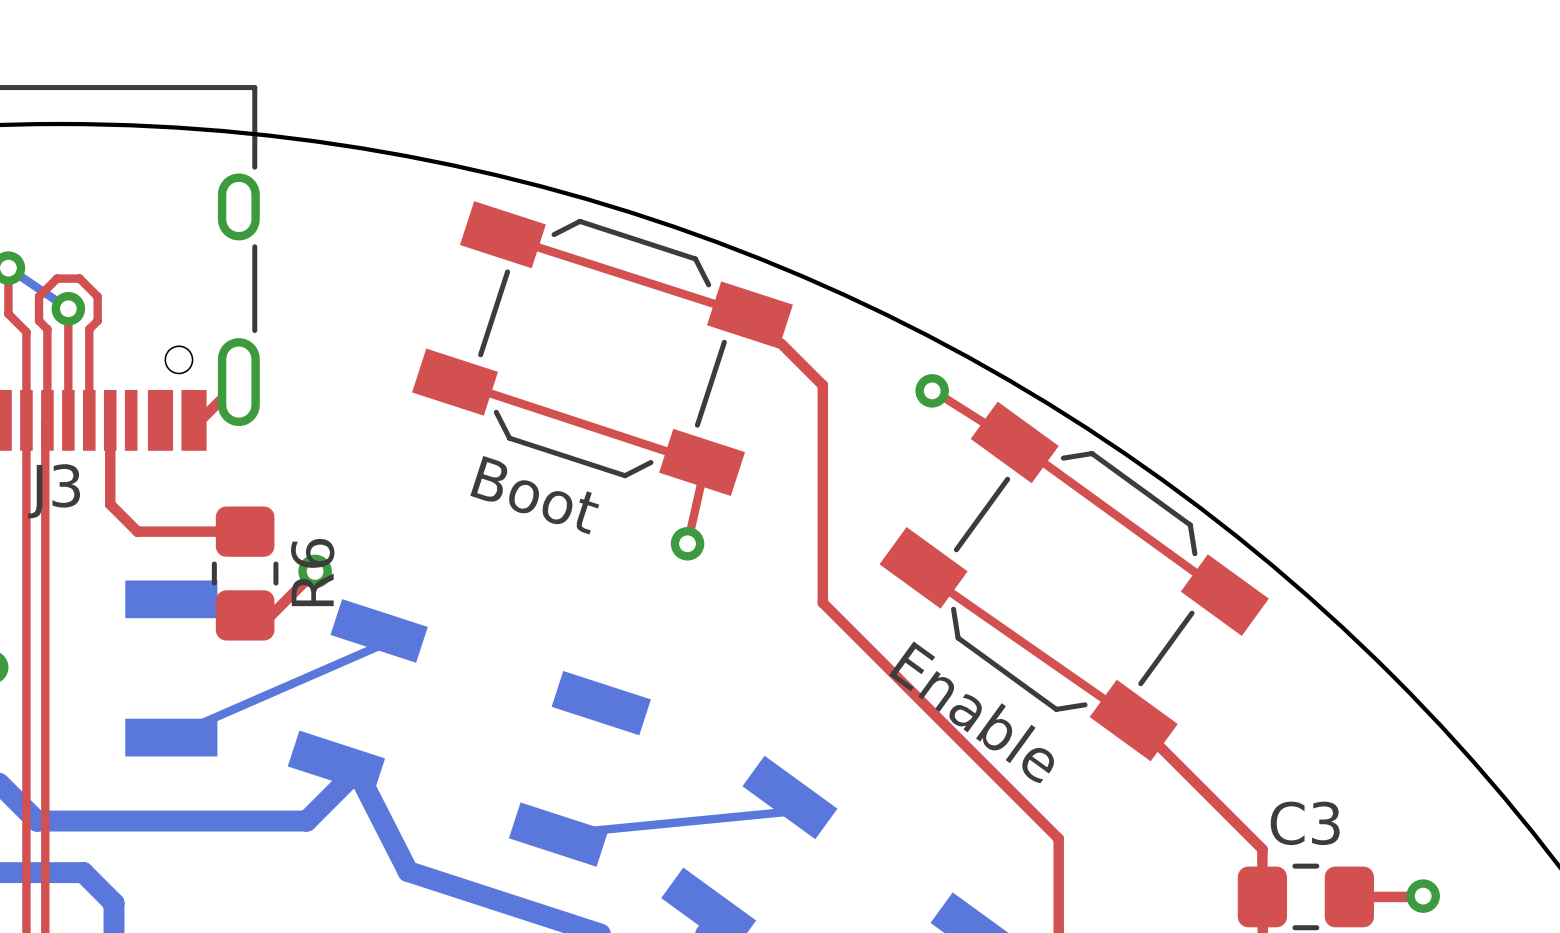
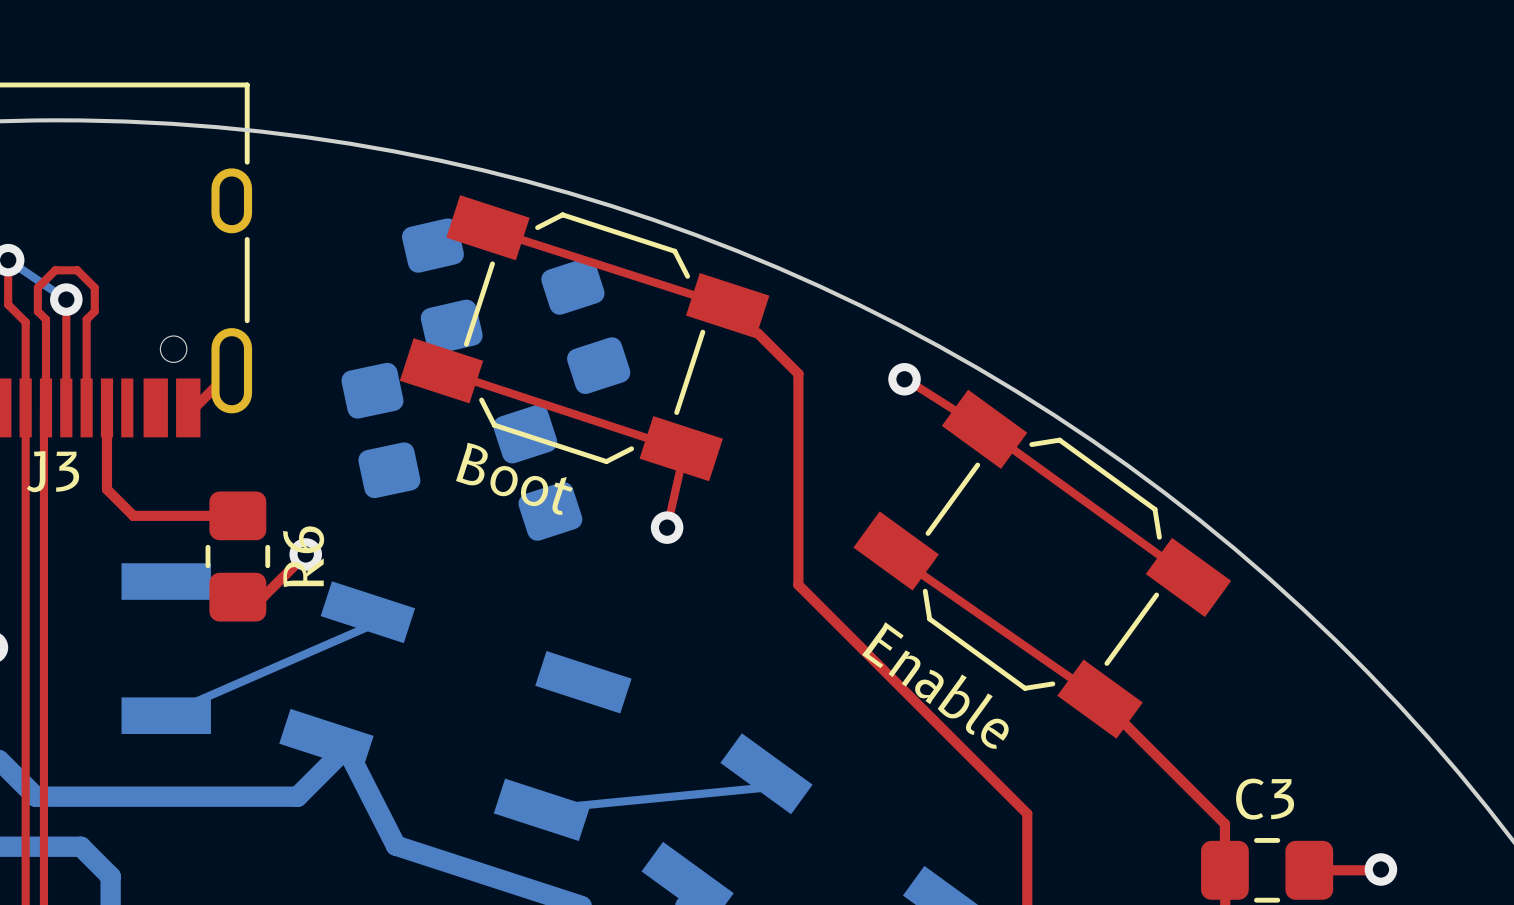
part: none -> (442, 286)
part: none -> (585, 326)
part: none -> (380, 430)
part: none -> (537, 472)

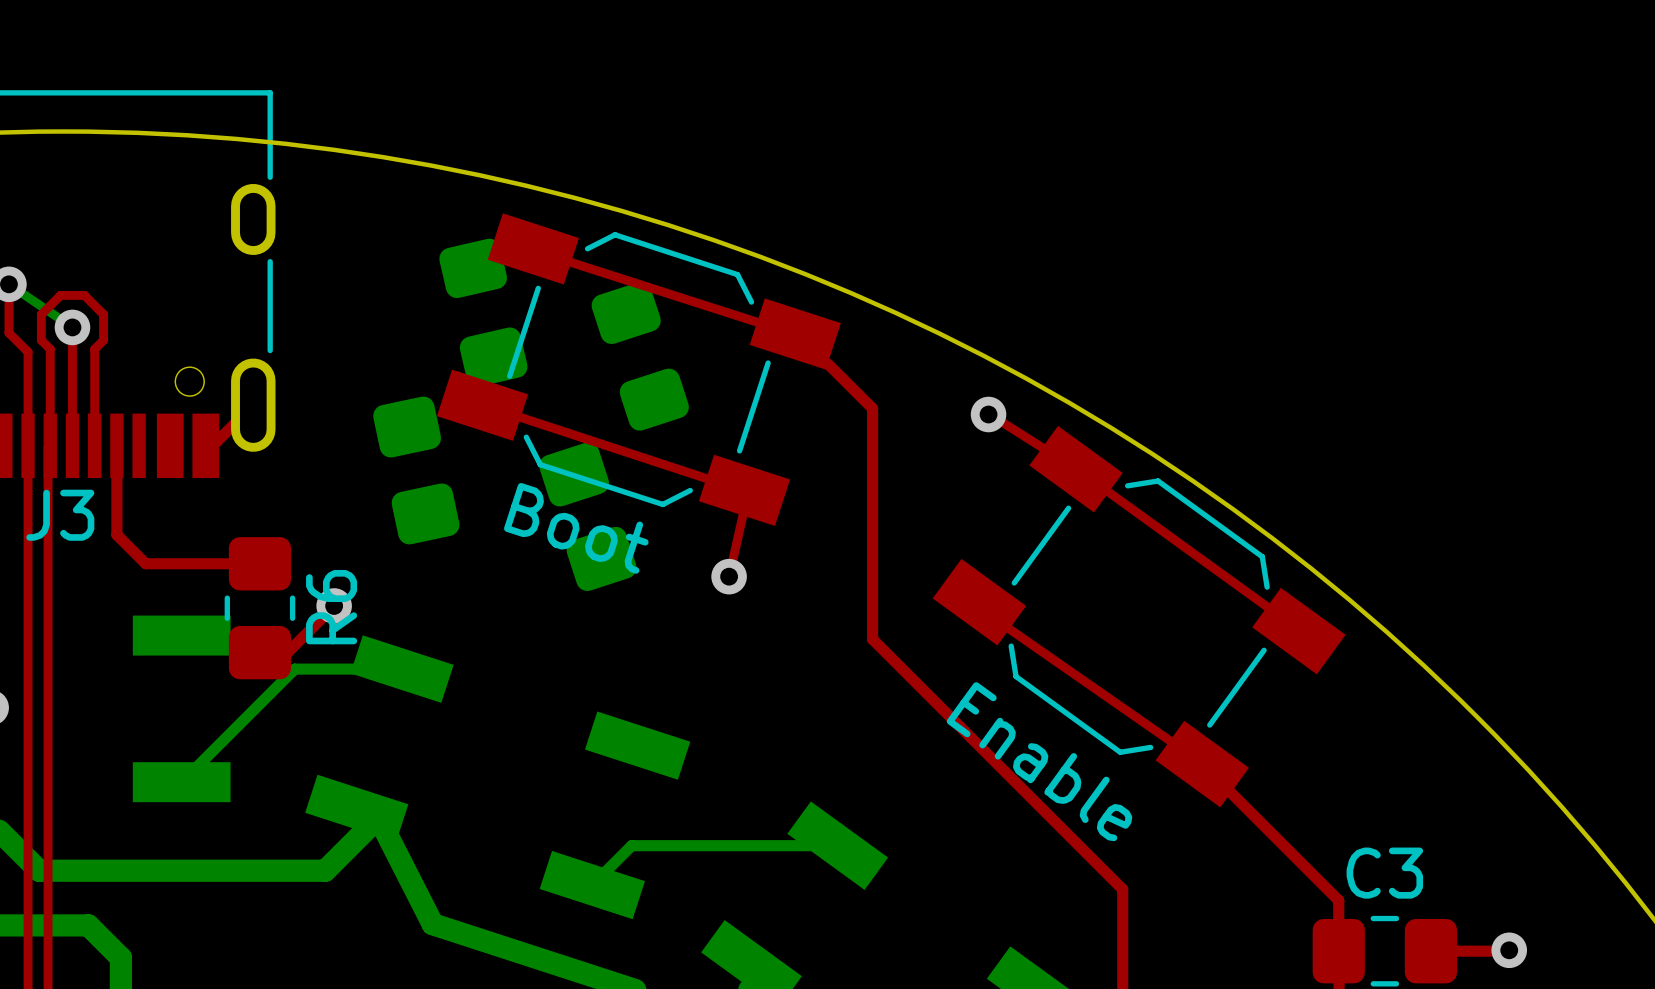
bottom track: none -> (402, 669) (294, 669) (181, 782)
bottom track: (386, 618) (156, 719) -> none
bottom track: none -> (837, 845) (631, 845) (592, 885)
bottom track: (783, 785) (533, 810) -> none

